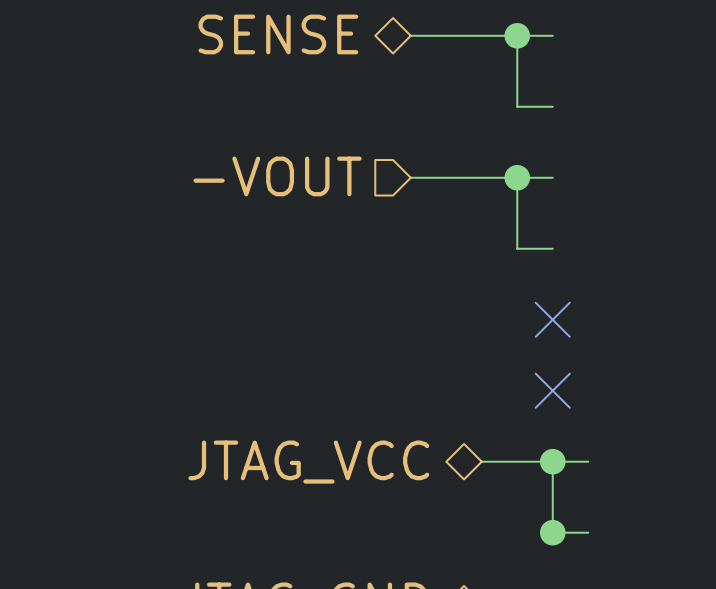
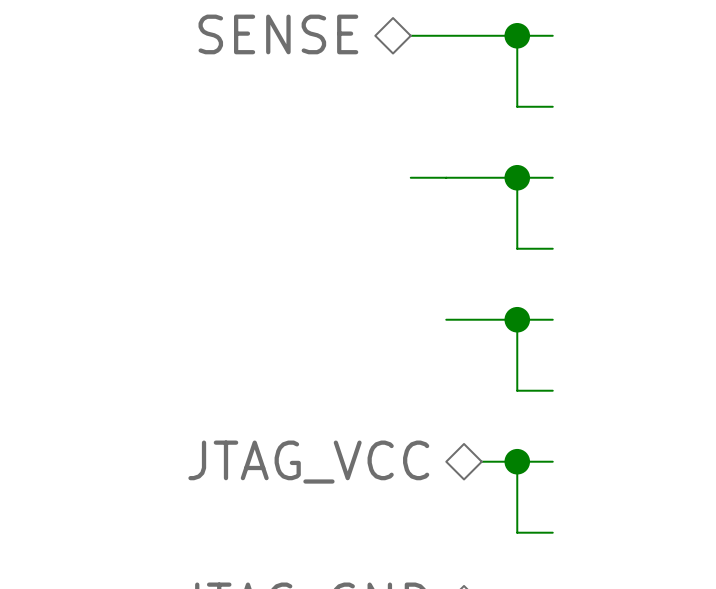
hierarchical label: -VOUT (277, 176) -> none
wire: none -> (446, 319) (552, 319)
wire: none -> (517, 319) (517, 390) (552, 390)
junction: none -> (517, 319)
no-connect mark: (552, 319) -> none
no-connect mark: (552, 390) -> none
wire: none -> (517, 461) (517, 532) (552, 532)
junction position: (552, 461) -> (517, 461)
wire: (588, 461) (552, 461) (552, 532) (588, 532) -> none
junction: (552, 532) -> none

